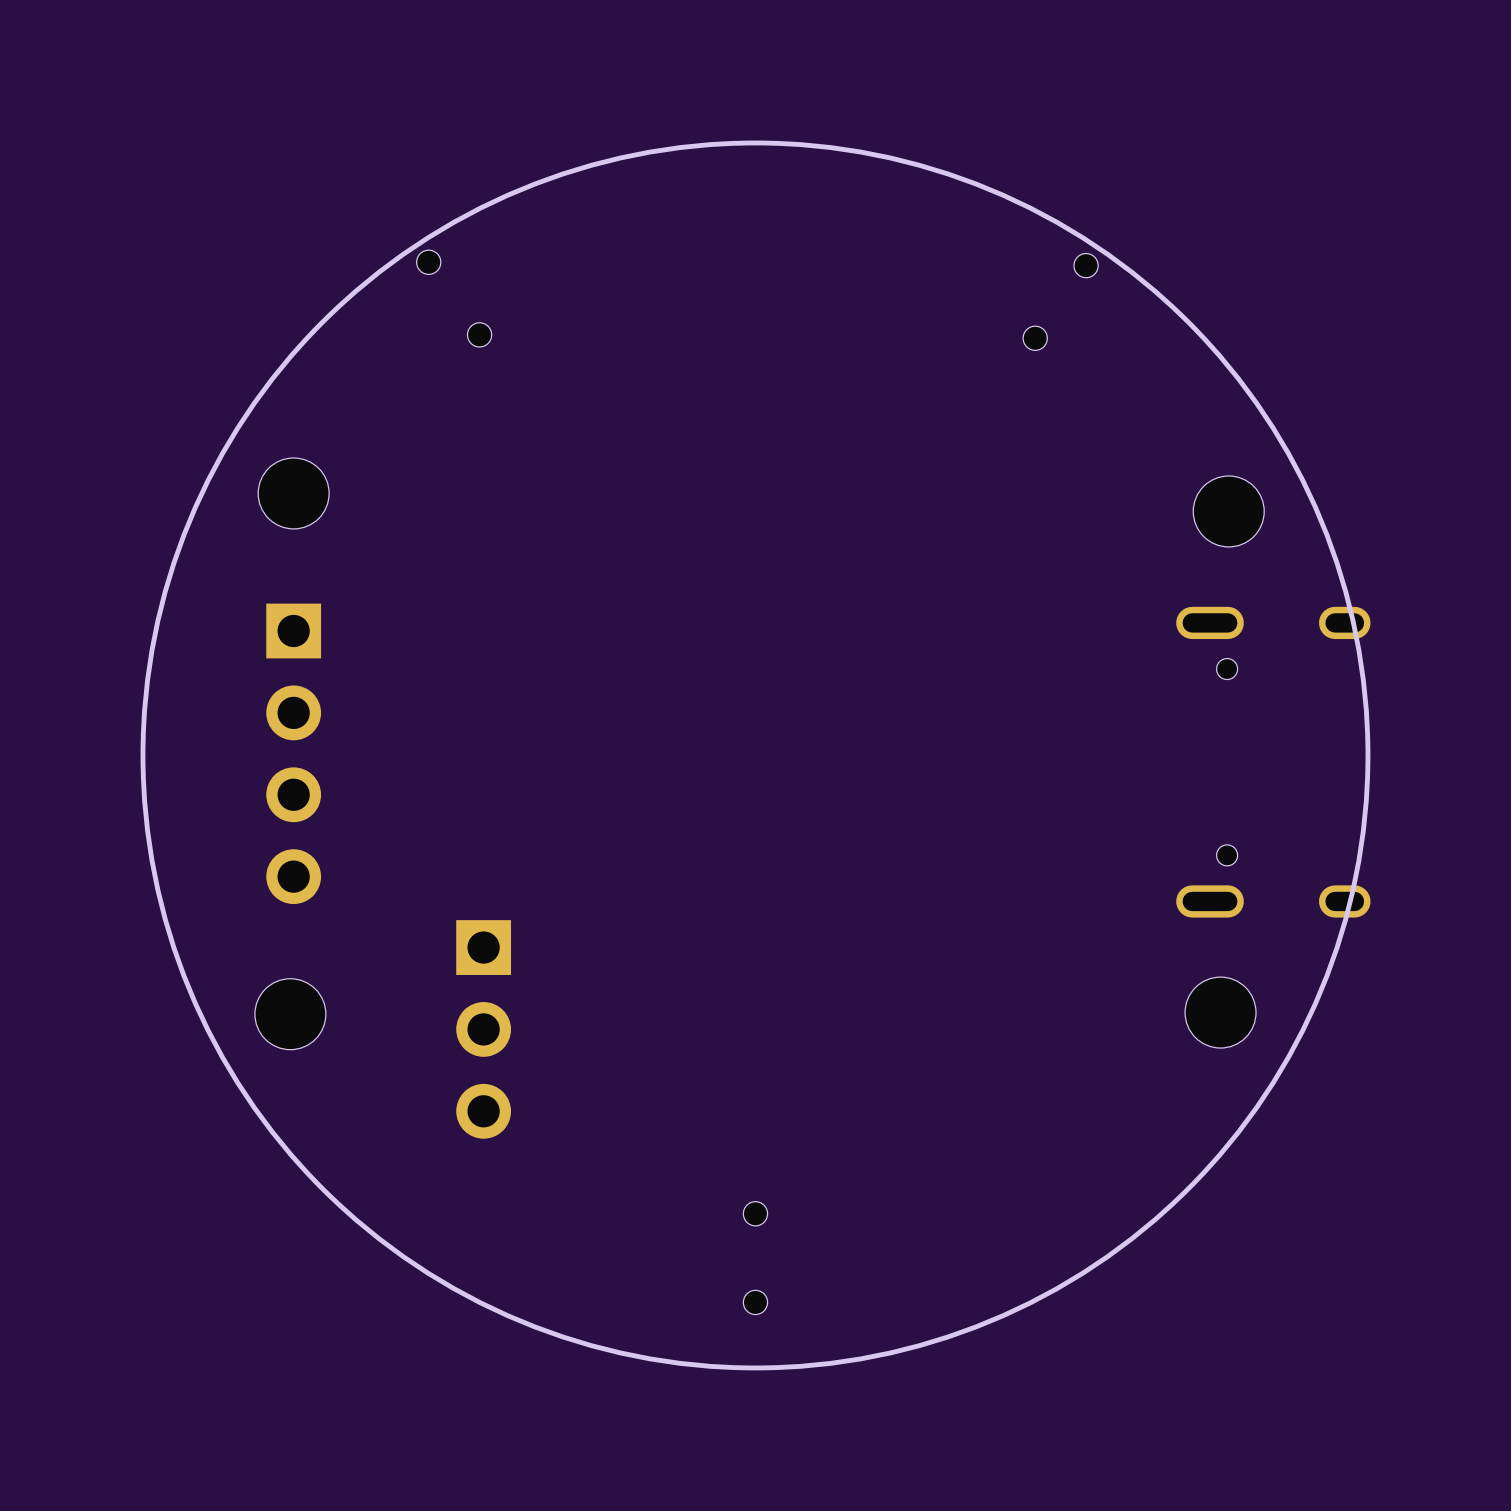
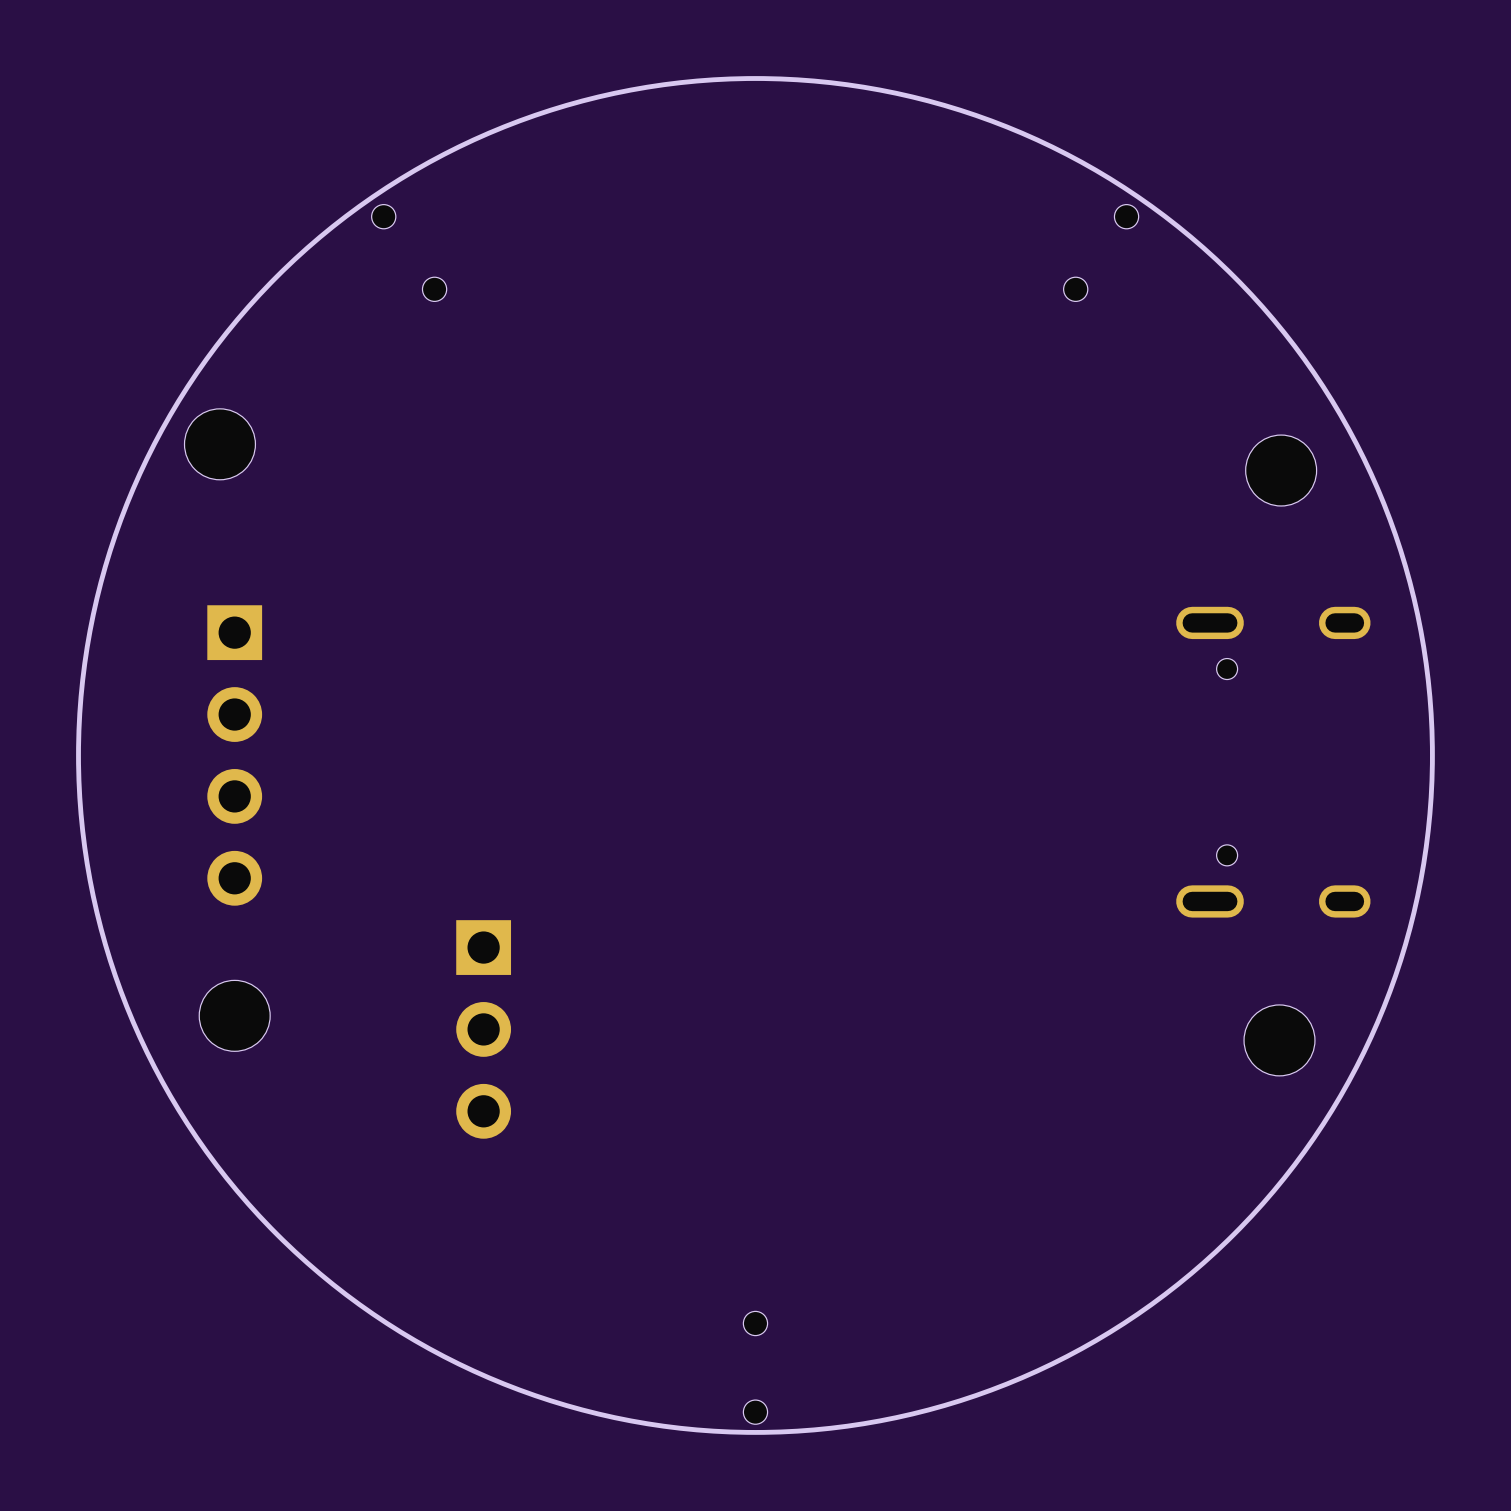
round board edge size: [140, 140, 1371, 1371] -> [76, 76, 1435, 1435]
part position: (454, 298) -> (409, 253)
part position: (1060, 301) -> (1101, 253)
part position: (293, 493) -> (219, 444)
part position: (1228, 511) -> (1281, 470)
part position: (293, 753) -> (234, 755)
part position: (1220, 1012) -> (1279, 1040)
part position: (290, 1014) -> (234, 1015)
part position: (755, 1258) -> (755, 1367)

